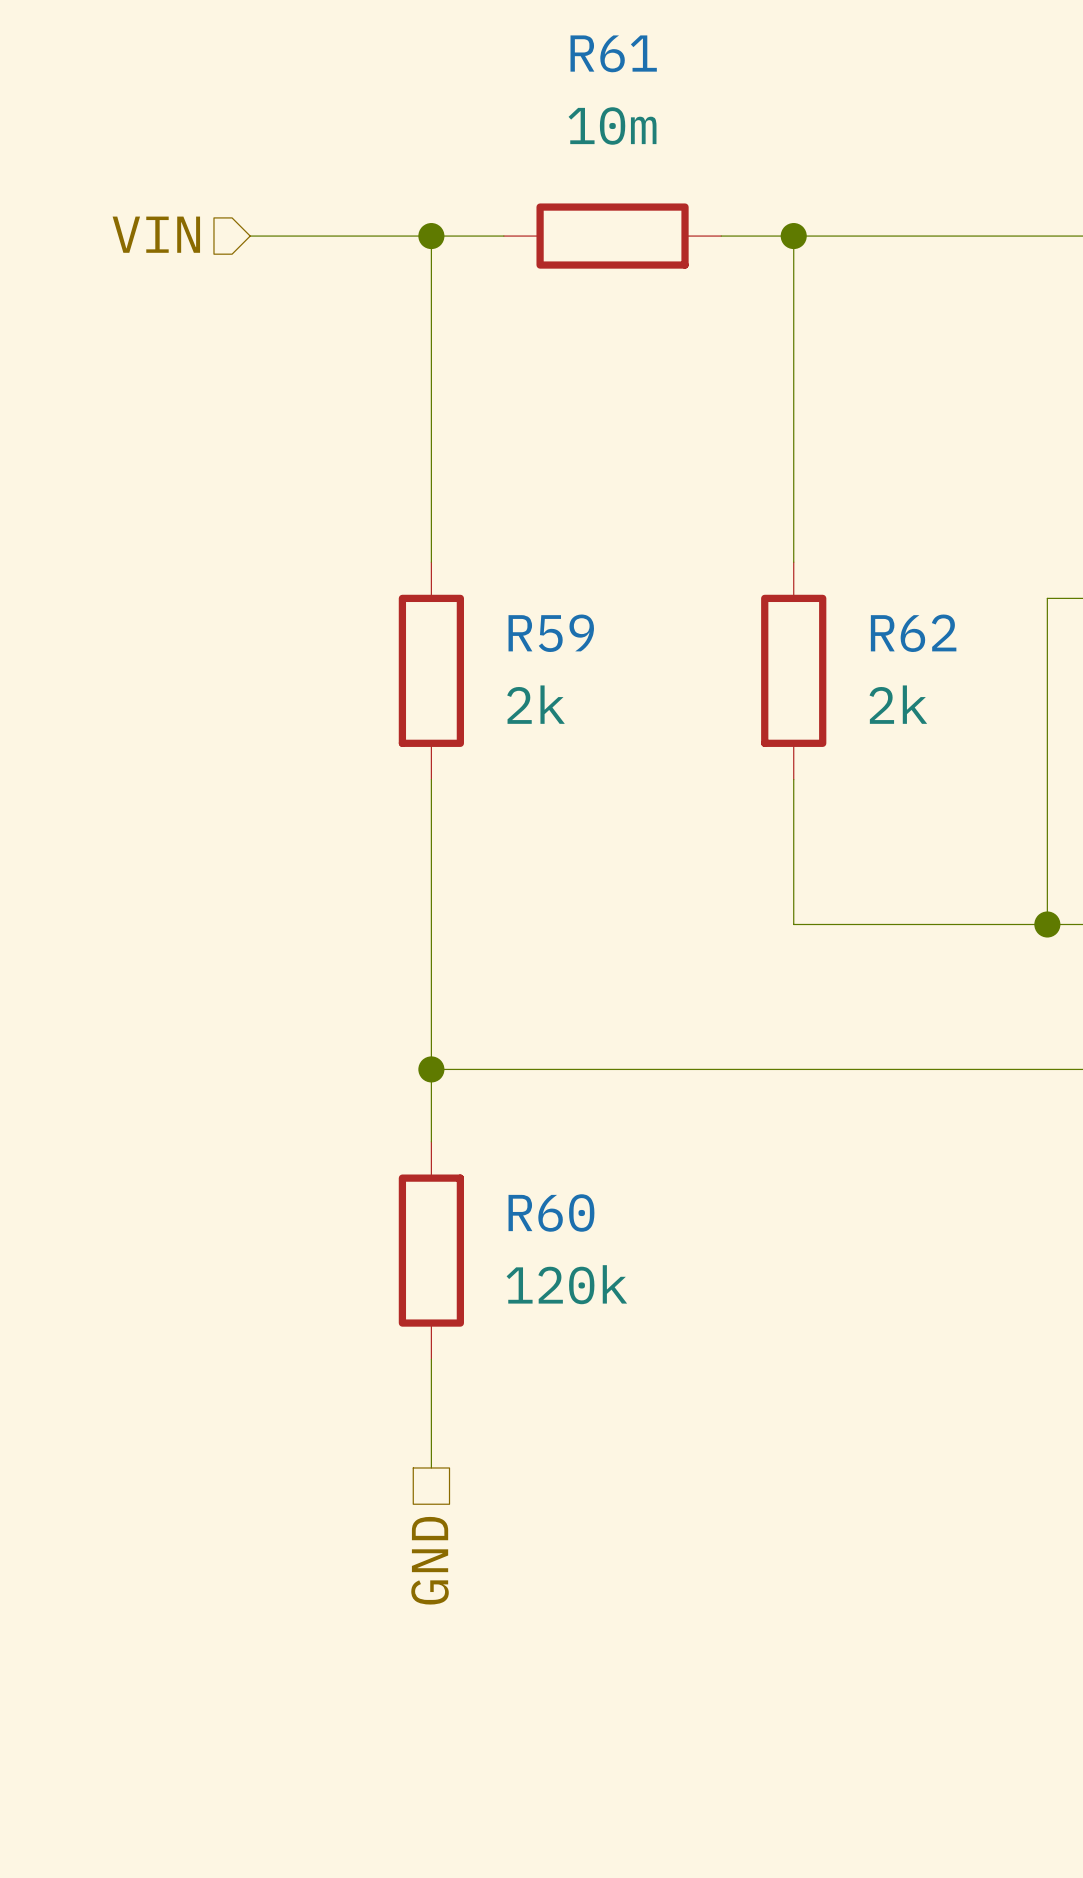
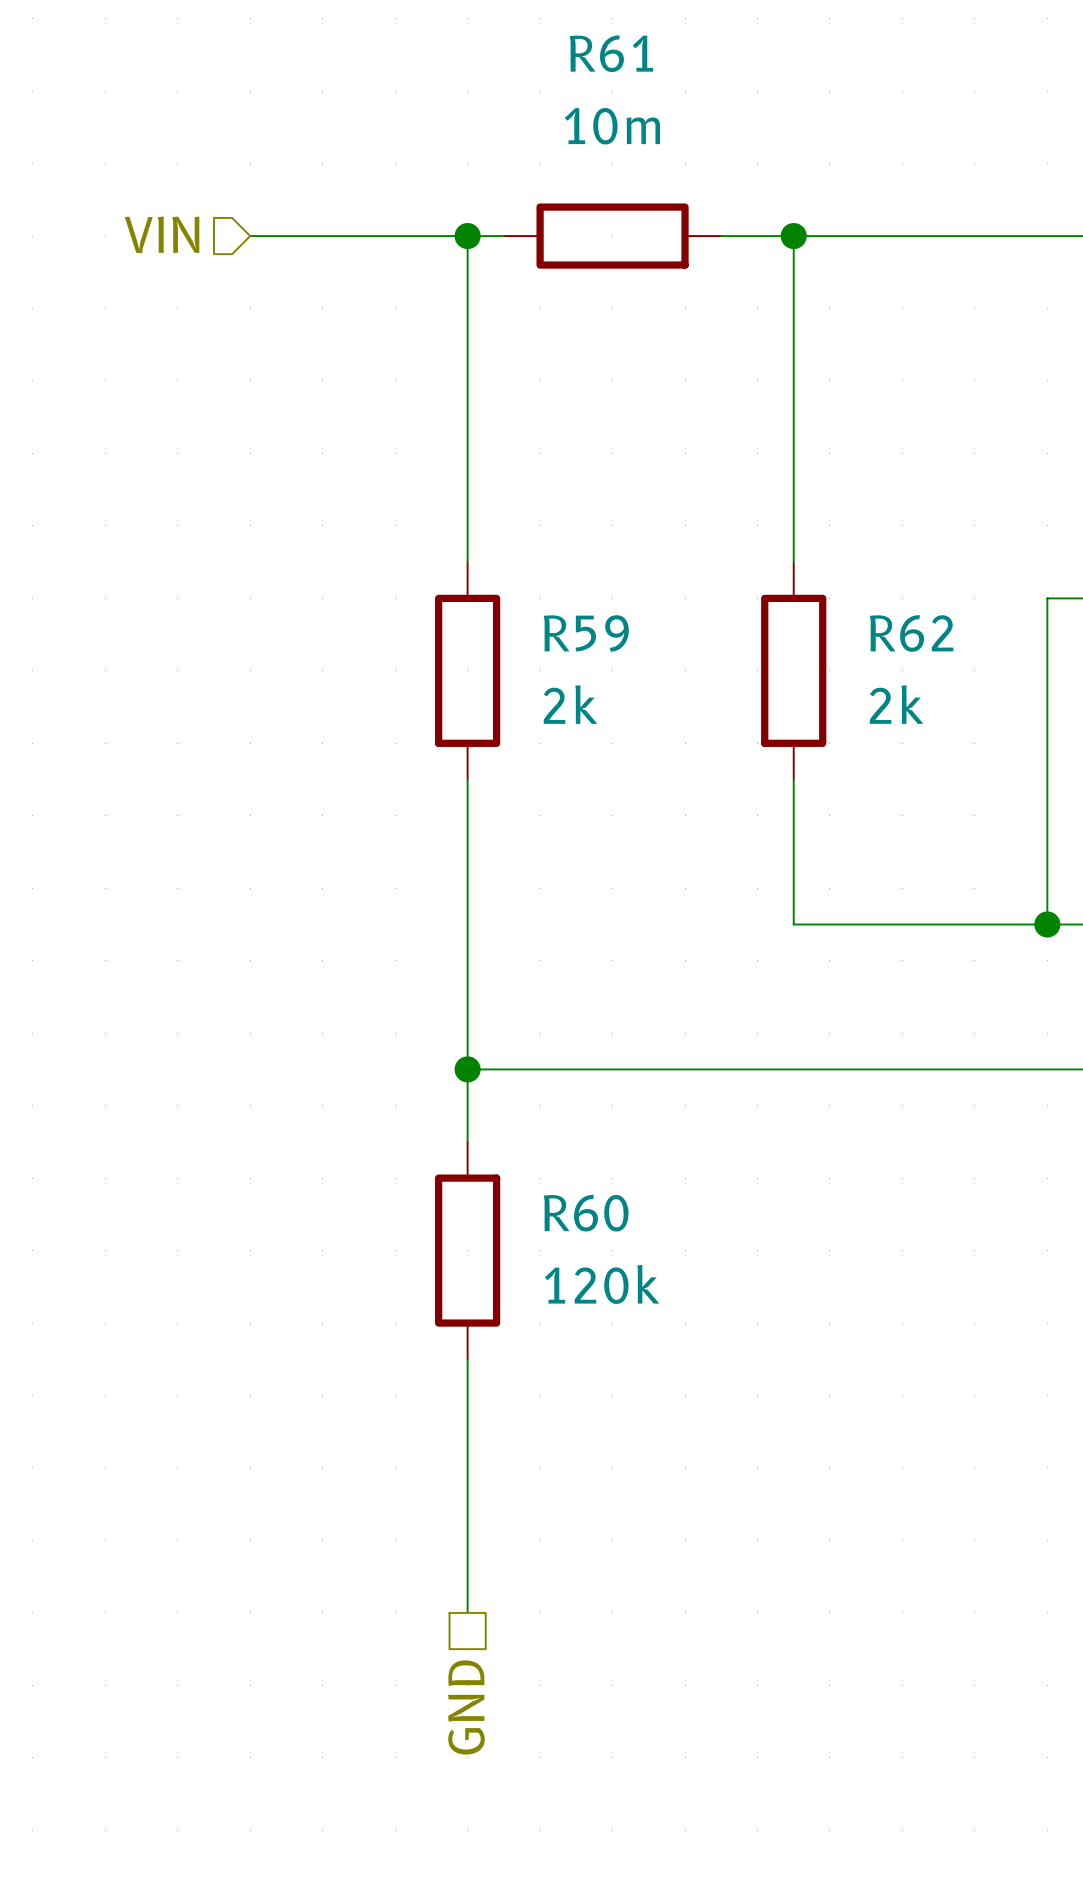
wire: (431, 236) (431, 562) -> (467, 236) (467, 562)
junction position: (431, 236) -> (467, 236)
R59 position: (431, 670) -> (467, 670)
wire: (431, 779) (431, 1141) -> (467, 779) (467, 1141)
wire: (431, 1069) (467, 1069) -> none
junction position: (431, 1069) -> (467, 1069)
R60 position: (431, 1250) -> (467, 1250)
wire: (431, 1359) (431, 1467) -> none
wire: none -> (467, 1359) (467, 1612)
hierarchical label position: GND (430, 1560) -> GND (466, 1707)

